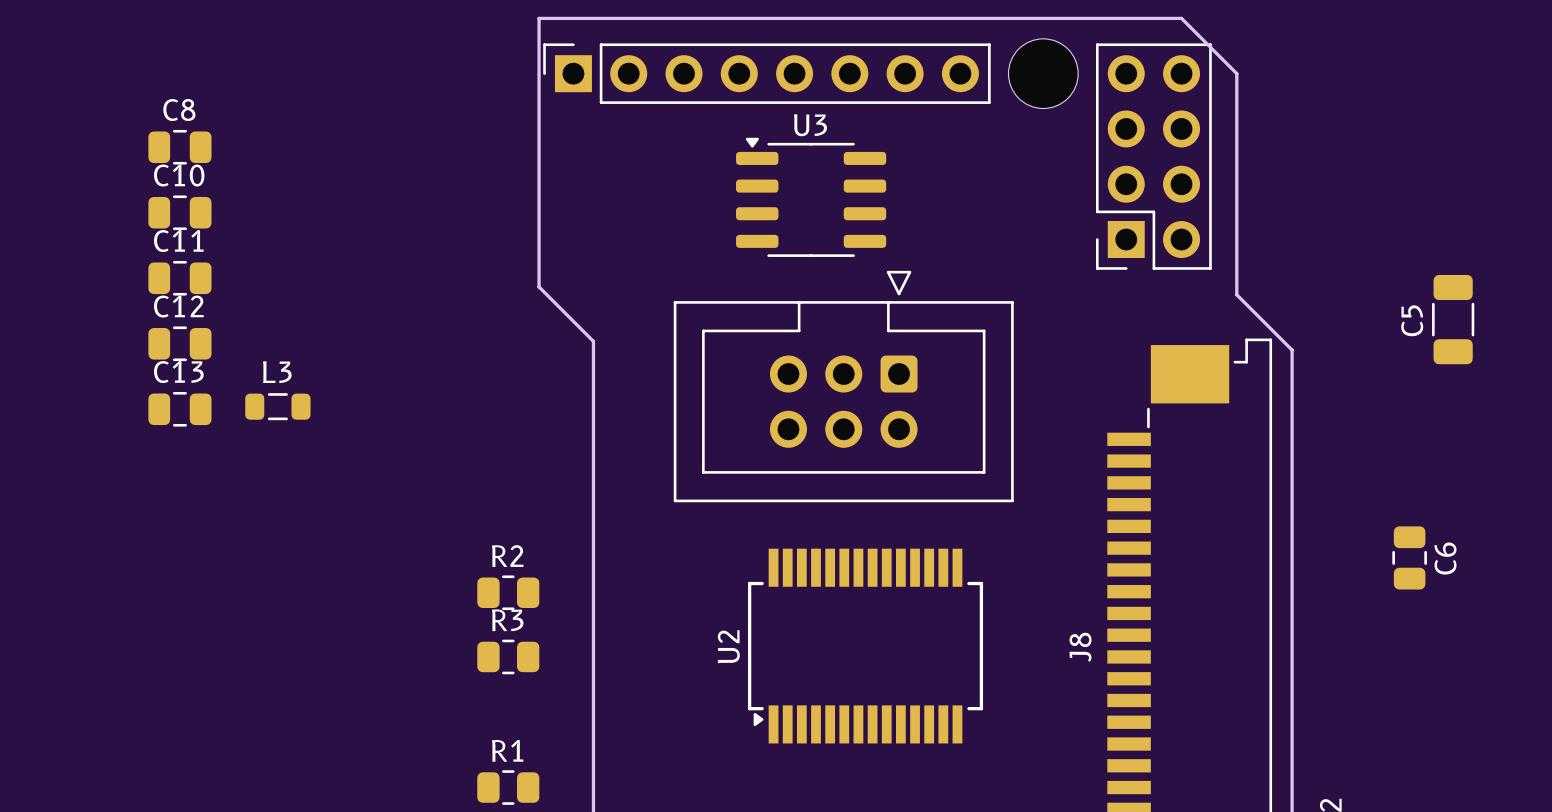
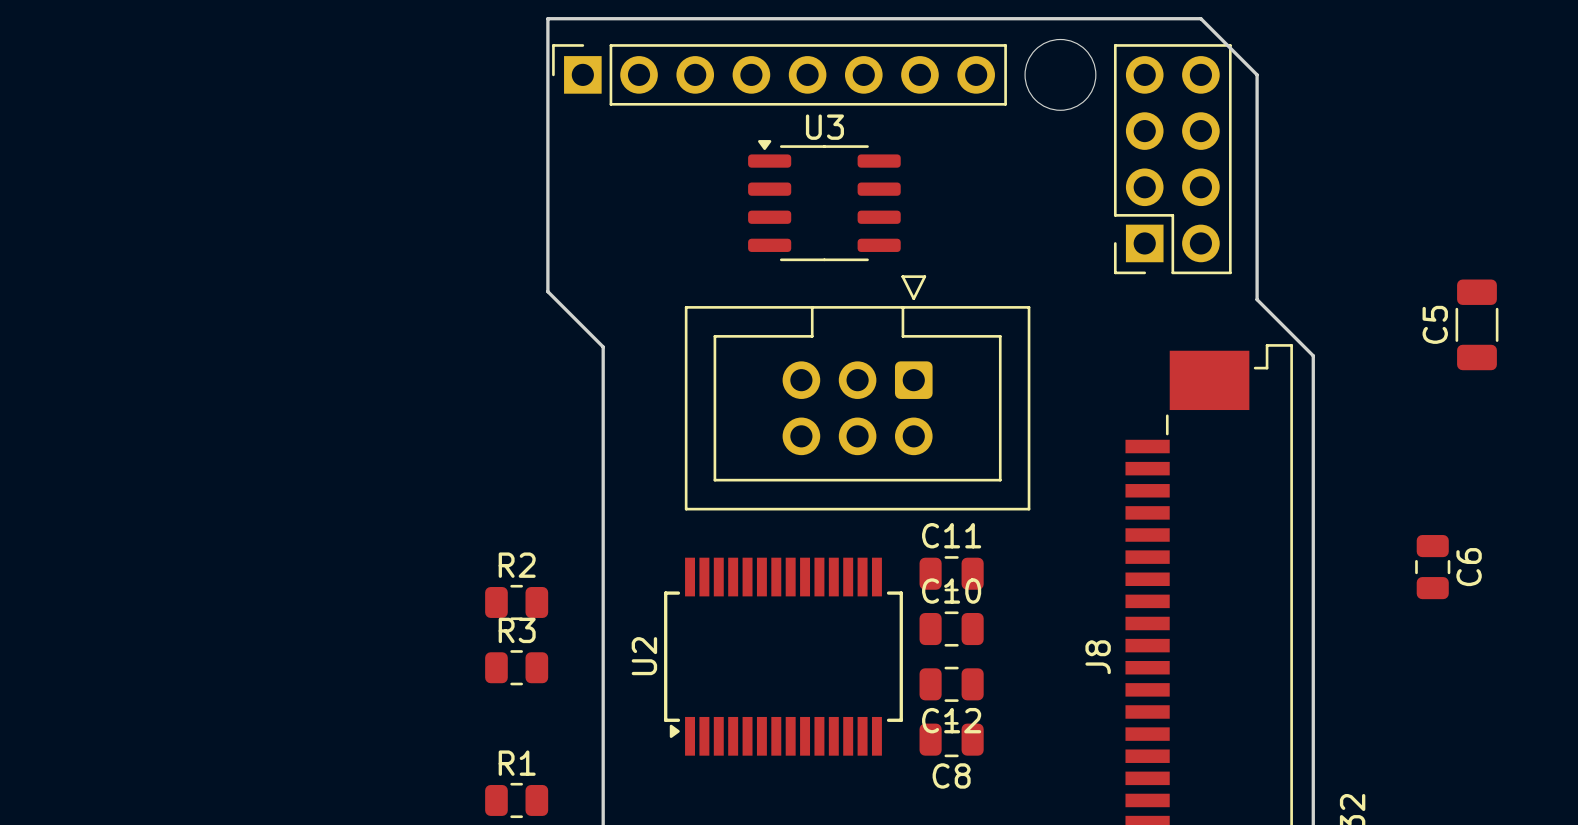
C8 name position: C8 (179, 110) -> C8 (951, 775)
C8 position: (179, 147) -> (951, 739)
C10 position: (179, 212) -> (951, 629)
C11 position: (179, 278) -> (951, 573)
C12 name position: C12 (178, 306) -> C12 (951, 720)
C12 position: (179, 343) -> (951, 684)
L3: (277, 406) -> none
C13: (179, 409) -> none
U2 position: (865, 646) -> (783, 656)

